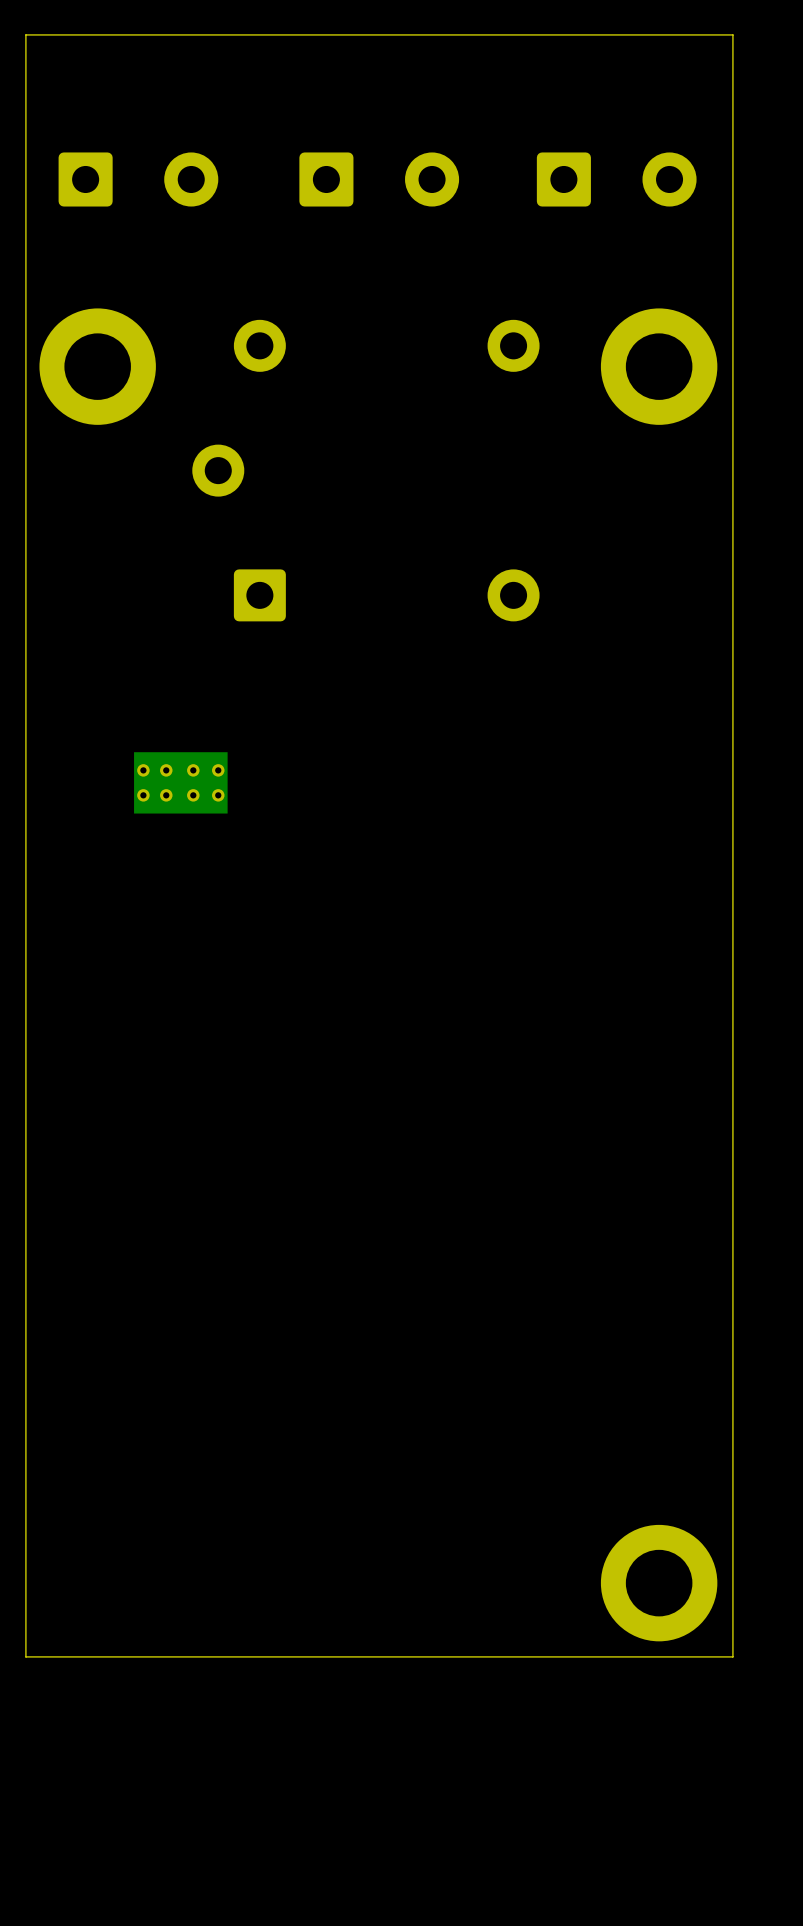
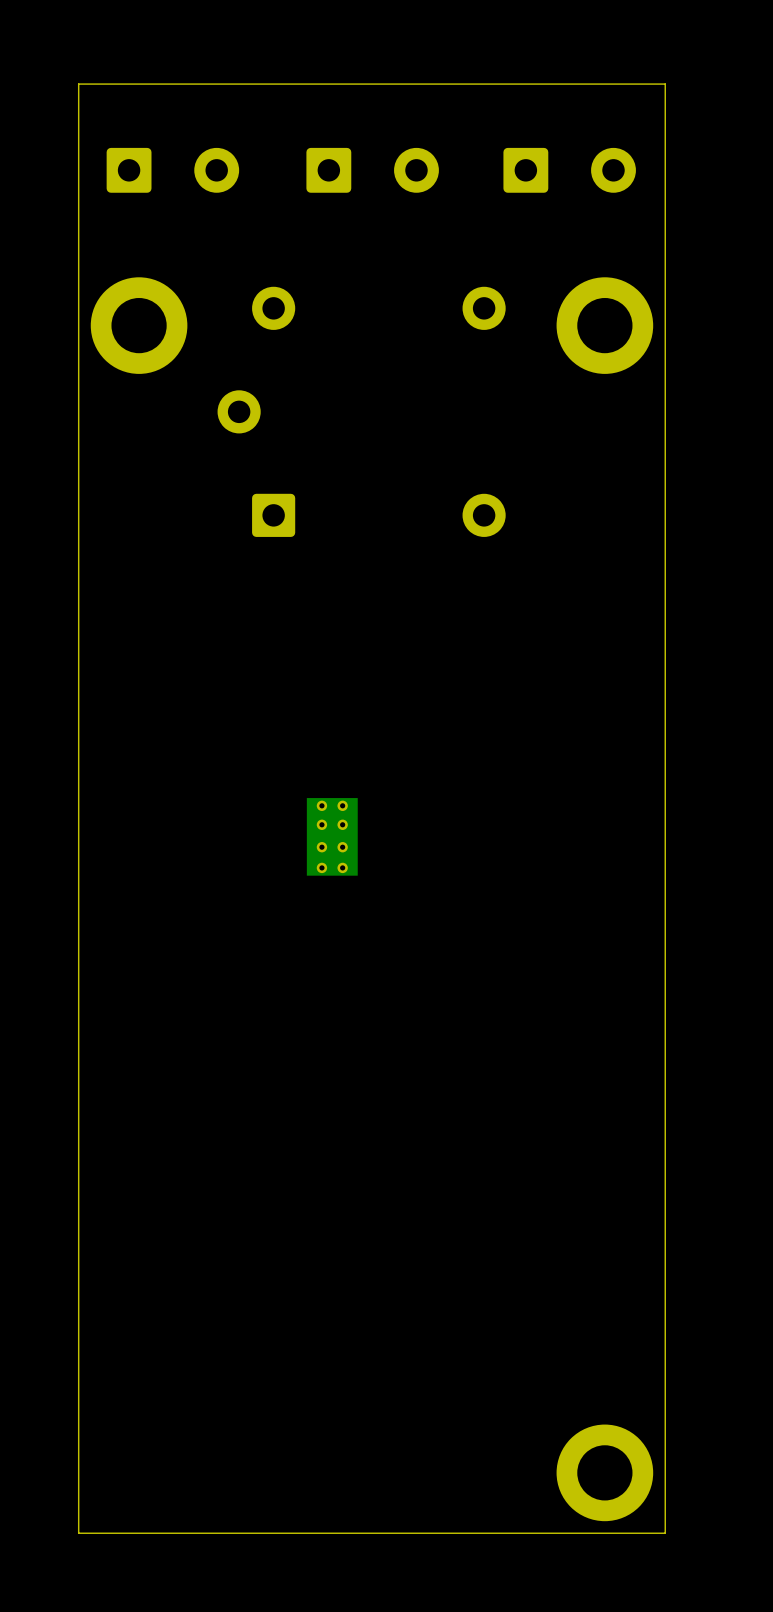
board edge: (732, 34) (25, 34) (25, 1656) (732, 1656) (732, 34) -> (665, 84) (665, 1533) (78, 1533) (78, 84) (665, 84)
part rotation: 0° (180, 782) -> 90° clockwise (332, 836)
part position: (180, 782) -> (332, 836)
part position: (659, 1583) -> (604, 1472)

